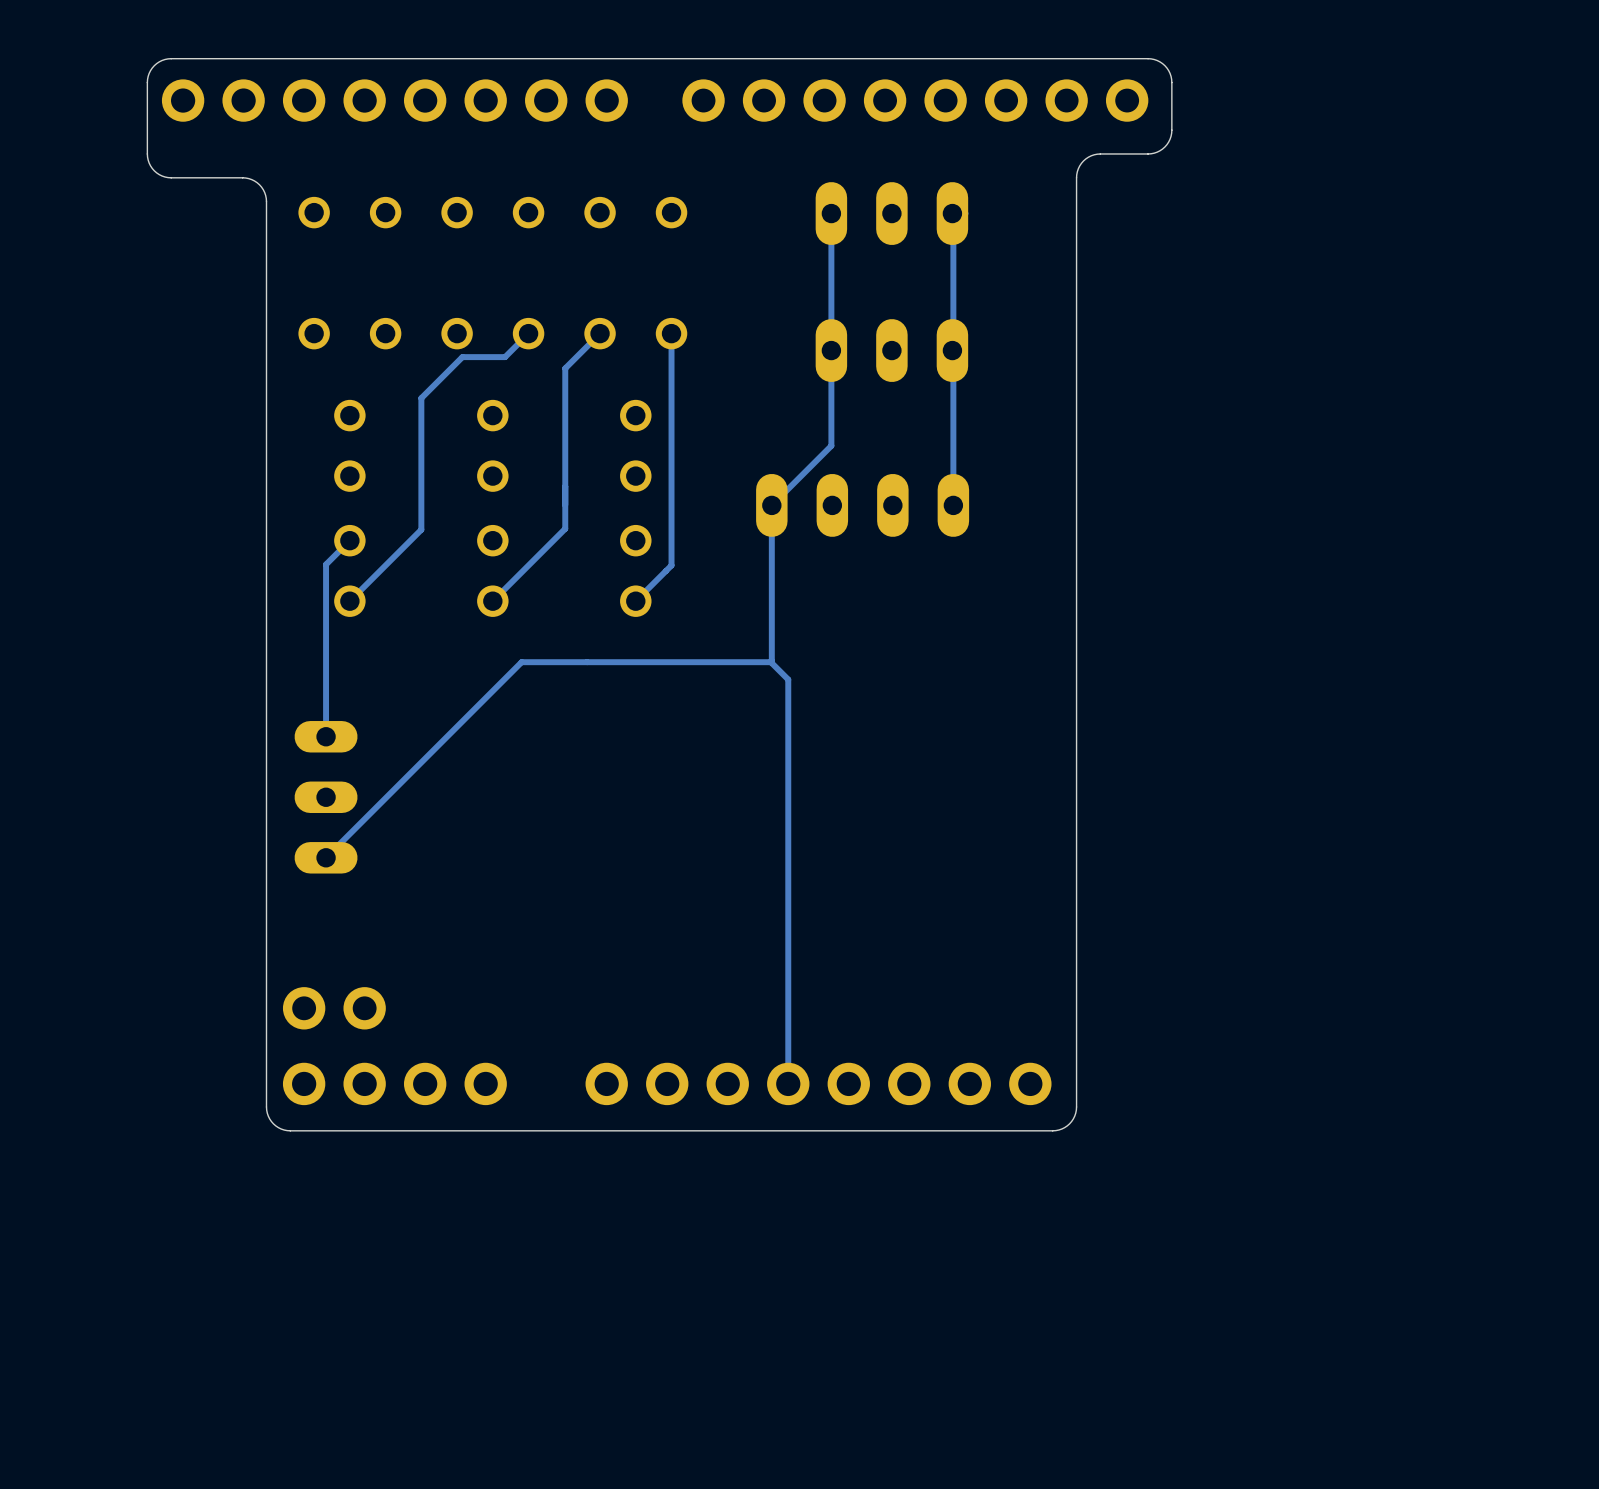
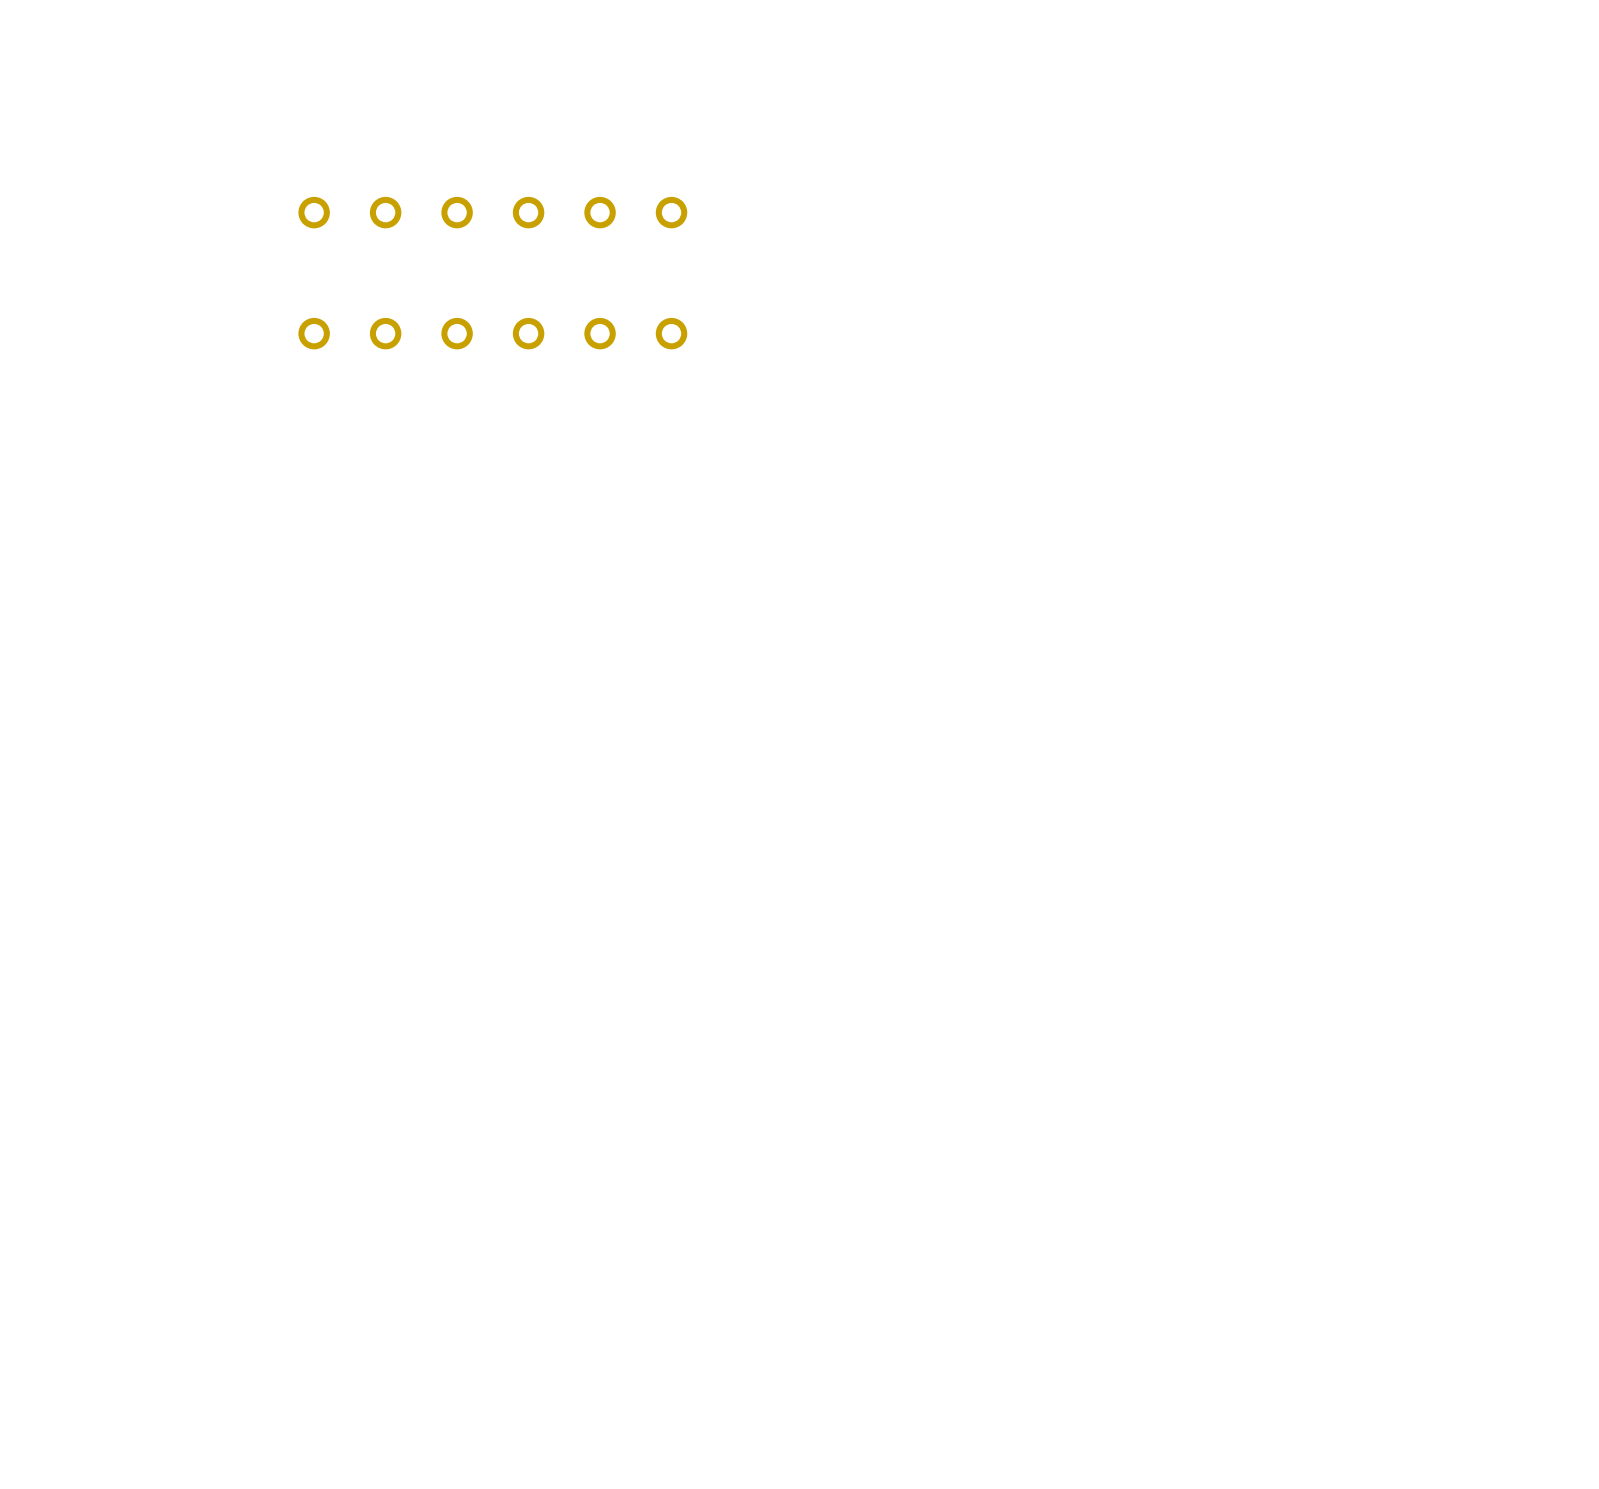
board edge: (1148, 58) (171, 58) (159, 61) (152, 68) (147, 82) (147, 153) (152, 168) (159, 174) (168, 177) (248, 178) (259, 184) (266, 198) (266, 1107) (268, 1116) (275, 1125) (290, 1130) (1052, 1130) (1061, 1129) (1071, 1121) (1076, 1107) (1076, 174) (1081, 163) (1091, 155) (1100, 153) (1151, 153) (1159, 150) (1168, 142) (1171, 130) (1171, 76) (1162, 63) (1148, 58) -> none
part: (394, 100) -> none
part: (915, 100) -> none
track: (831, 213) (831, 445) (771, 505) (770, 662) -> none
part: (891, 213) -> none
track: (965, 213) (952, 213) (953, 505) -> none
track: (528, 333) (505, 357) (462, 357) (421, 398) (421, 529) (349, 601) -> none
track: (600, 333) (565, 368) (565, 528) (492, 601) -> none
track: (671, 333) (671, 565) (635, 601) -> none
part: (891, 350) -> none
part: (349, 445) -> none
part: (492, 445) -> none
part: (635, 445) -> none
part: (862, 505) -> none
track: (349, 540) (326, 564) (326, 736) -> none
part: (349, 570) -> none
part: (492, 570) -> none
part: (635, 570) -> none
track: (770, 662) (788, 679) (788, 1083) -> none
track: (770, 662) (521, 662) (326, 857) -> none
part: (326, 797) -> none
part: (334, 1008) -> none
part: (394, 1083) -> none
part: (818, 1083) -> none

